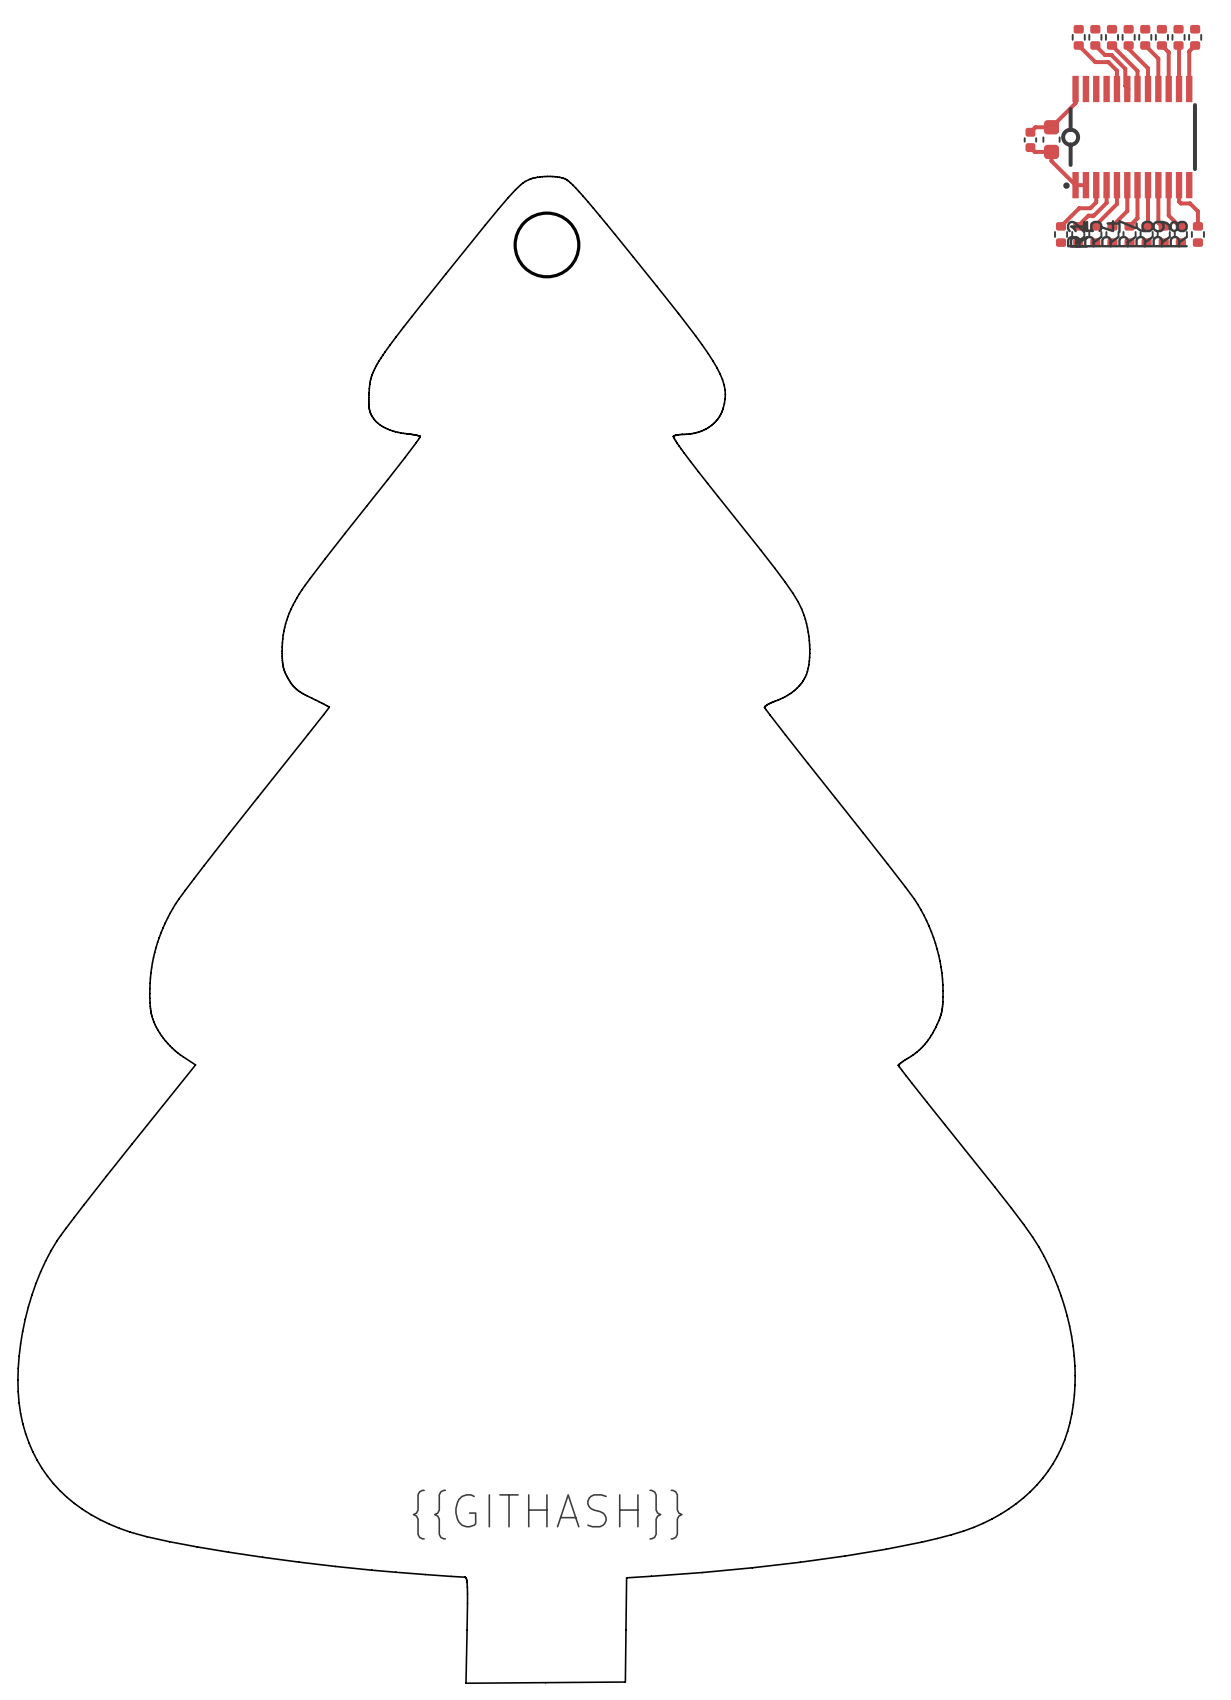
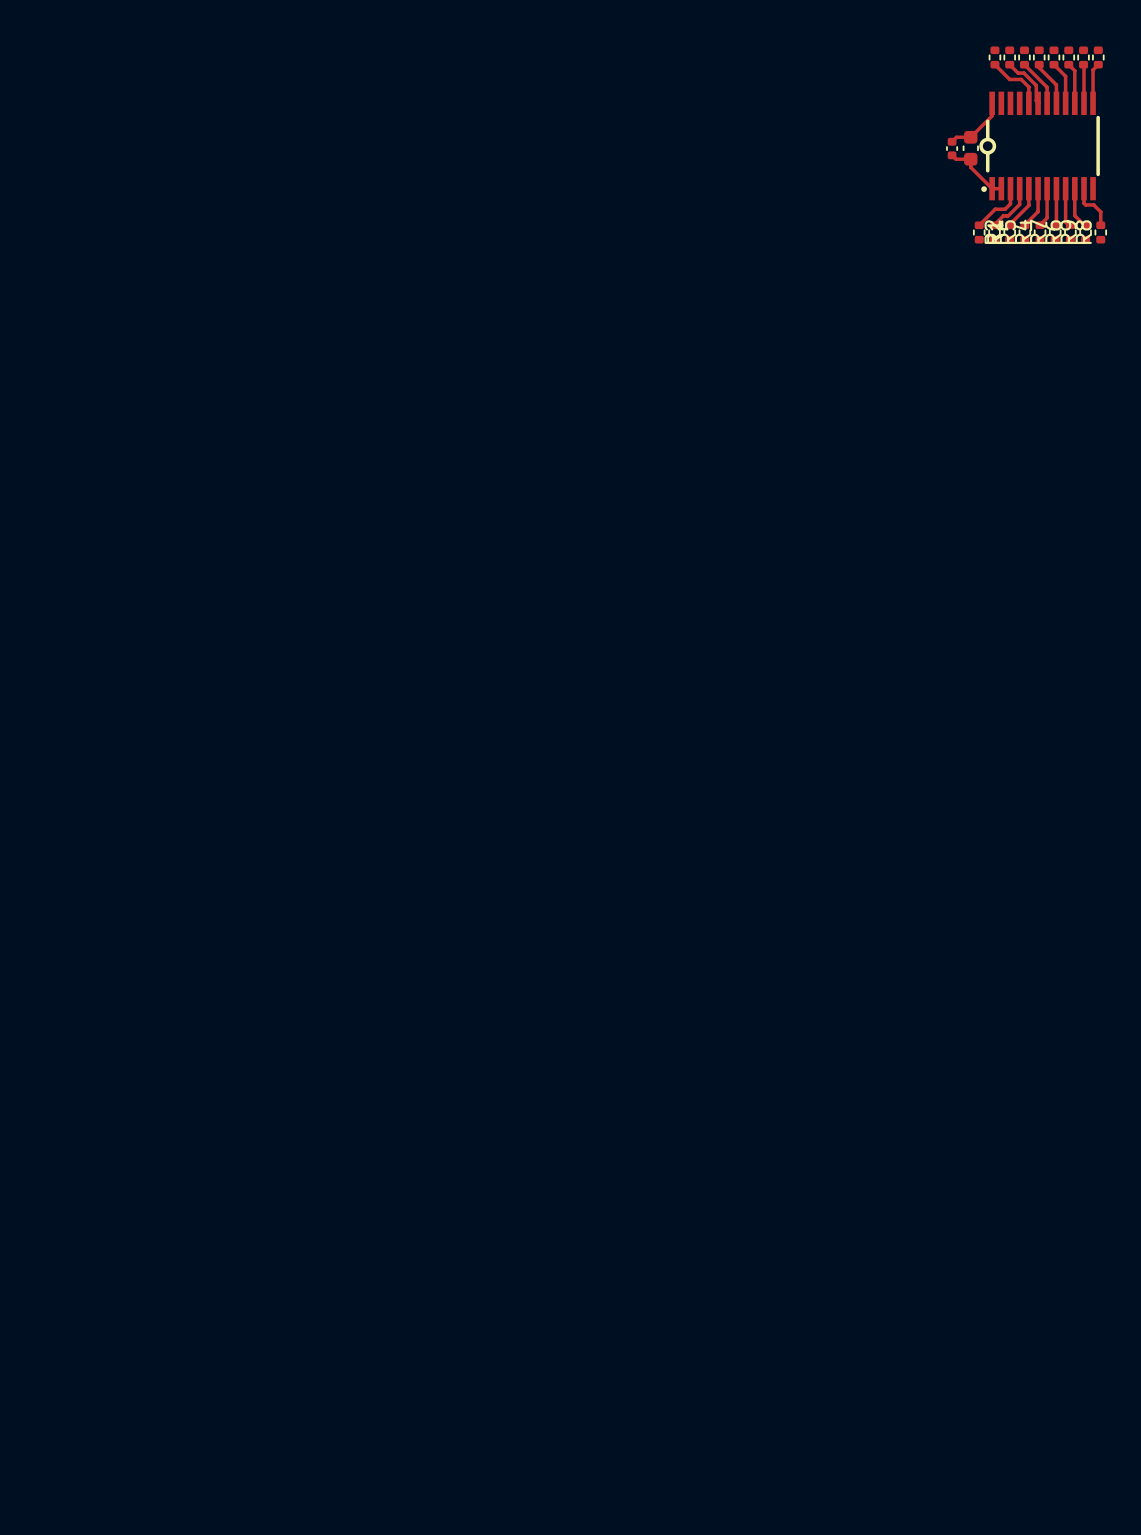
round board edge: [513, 211, 581, 279] -> none
board edge: (419, 436) (387, 429) (372, 417) (369, 408) (368, 395) (370, 380) (374, 368) (403, 327) (508, 197) (525, 181) (547, 176) (565, 179) (583, 196) (678, 313) (708, 353) (720, 374) (724, 384) (725, 398) (717, 418) (701, 430) (673, 436) -> none
board edge: (420, 436) (305, 585) (294, 601) (286, 620) (282, 651) (285, 674) (298, 690) (329, 707) -> none
board edge: (673, 436) (690, 461) (785, 582) (798, 601) (804, 615) (809, 644) (806, 674) (793, 691) (764, 706) -> none
board edge: (329, 707) (193, 879) (167, 918) (159, 937) (152, 962) (149, 988) (151, 1013) (156, 1027) (165, 1040) (177, 1052) (195, 1064) (57, 1240) (40, 1271) (28, 1307) (20, 1343) (17, 1380) (20, 1413) (25, 1433) (32, 1451) (47, 1476) (66, 1497) (90, 1514) (130, 1532) (197, 1546) (335, 1566) (465, 1577) (467, 1594) (465, 1683) (625, 1682) (626, 1577) (752, 1567) (845, 1556) (937, 1538) (963, 1531) (991, 1519) (1016, 1503) (1036, 1485) (1052, 1463) (1064, 1440) (1071, 1413) (1074, 1385) (1074, 1356) (1069, 1326) (1053, 1276) (1032, 1236) (898, 1065) -> none
board edge: (764, 707) (905, 886) (920, 909) (931, 931) (941, 973) (941, 1013) (934, 1030) (924, 1044) (898, 1064) -> none
text: {{GITHASH}} (547, 1514) -> none

